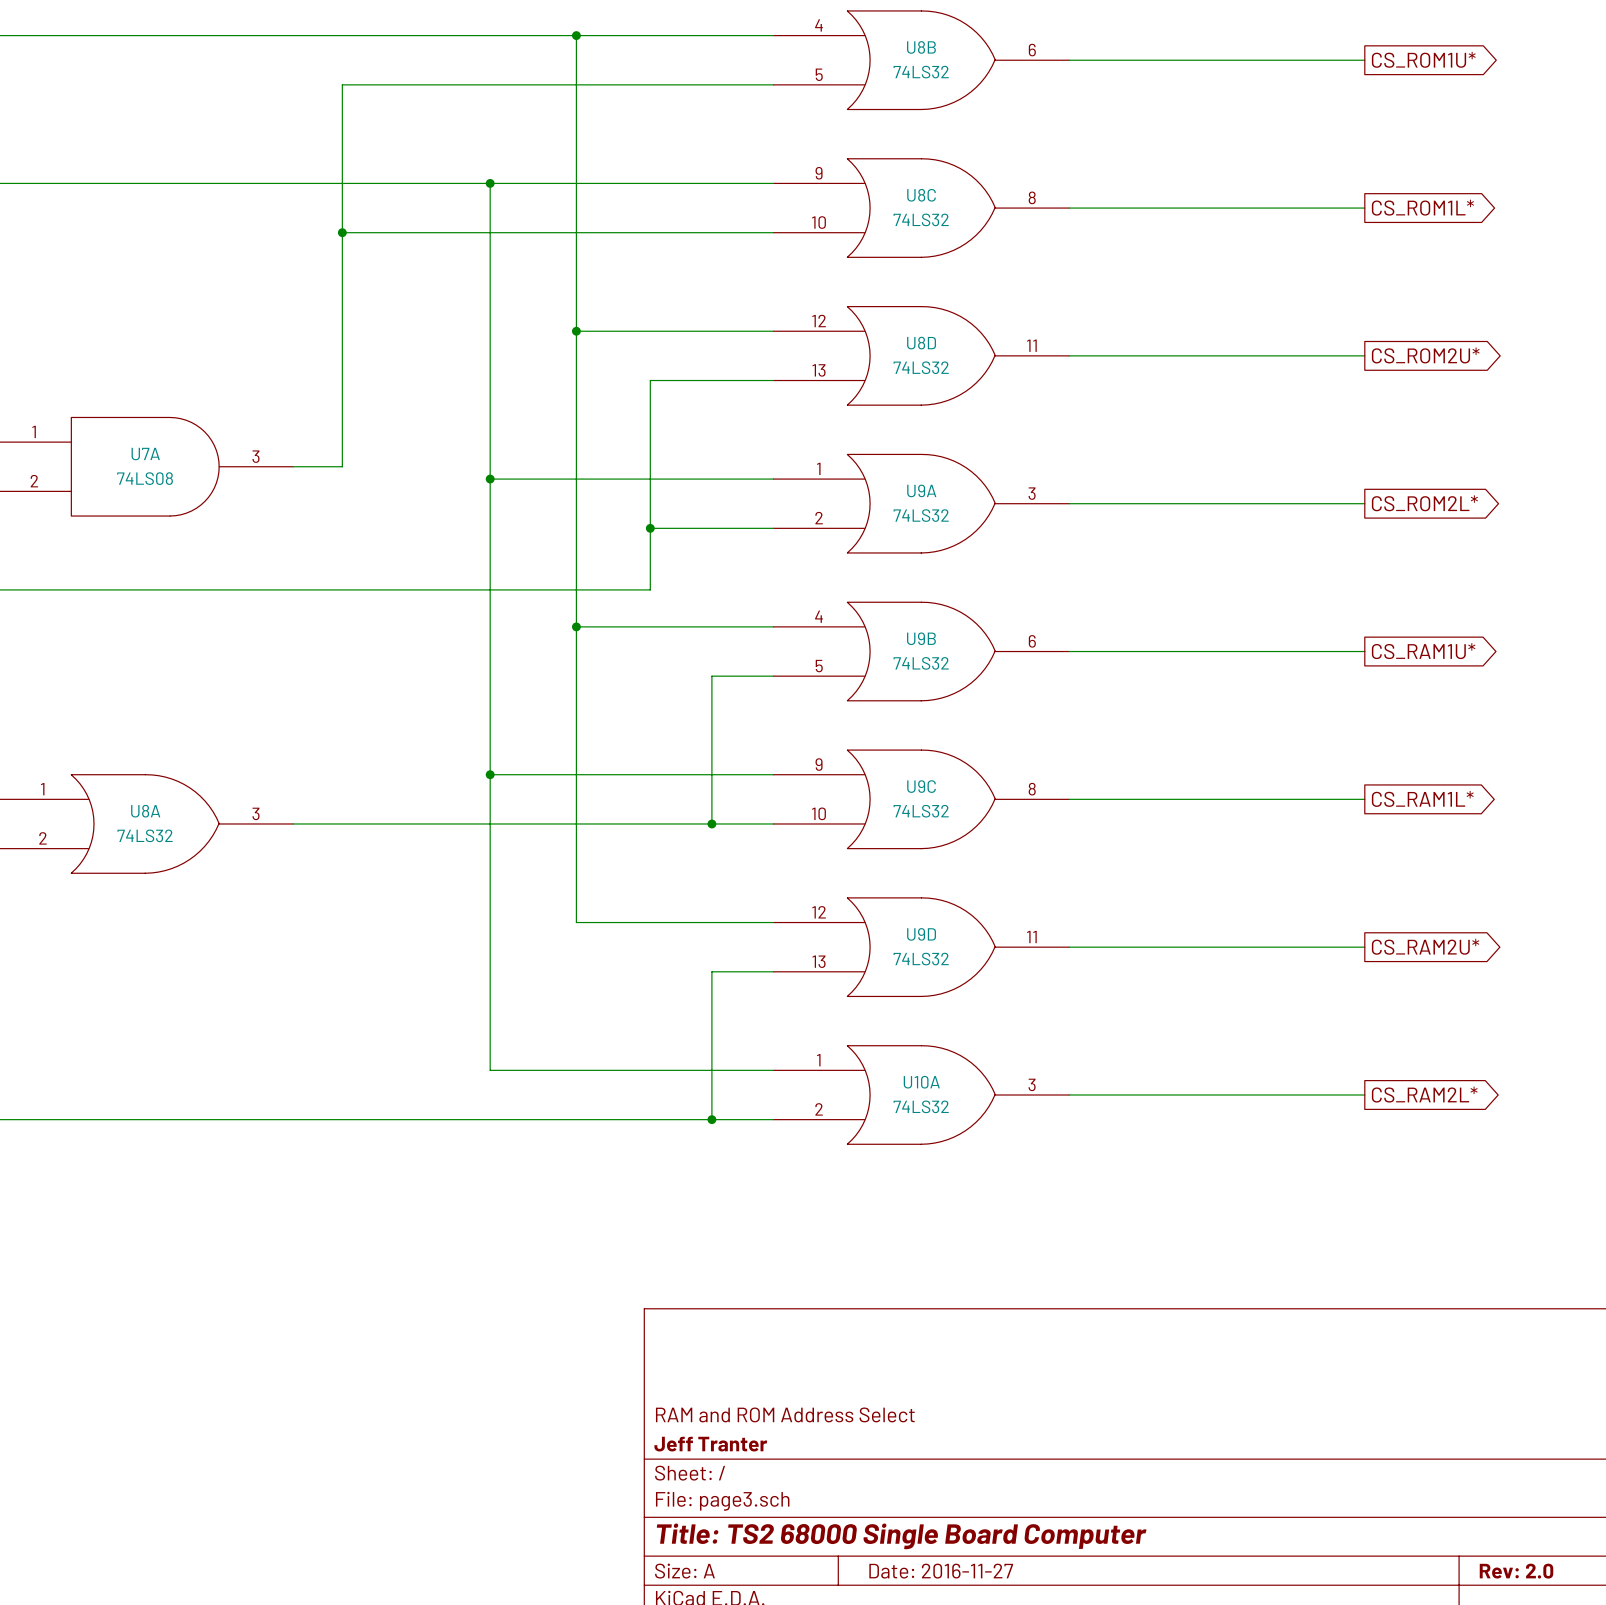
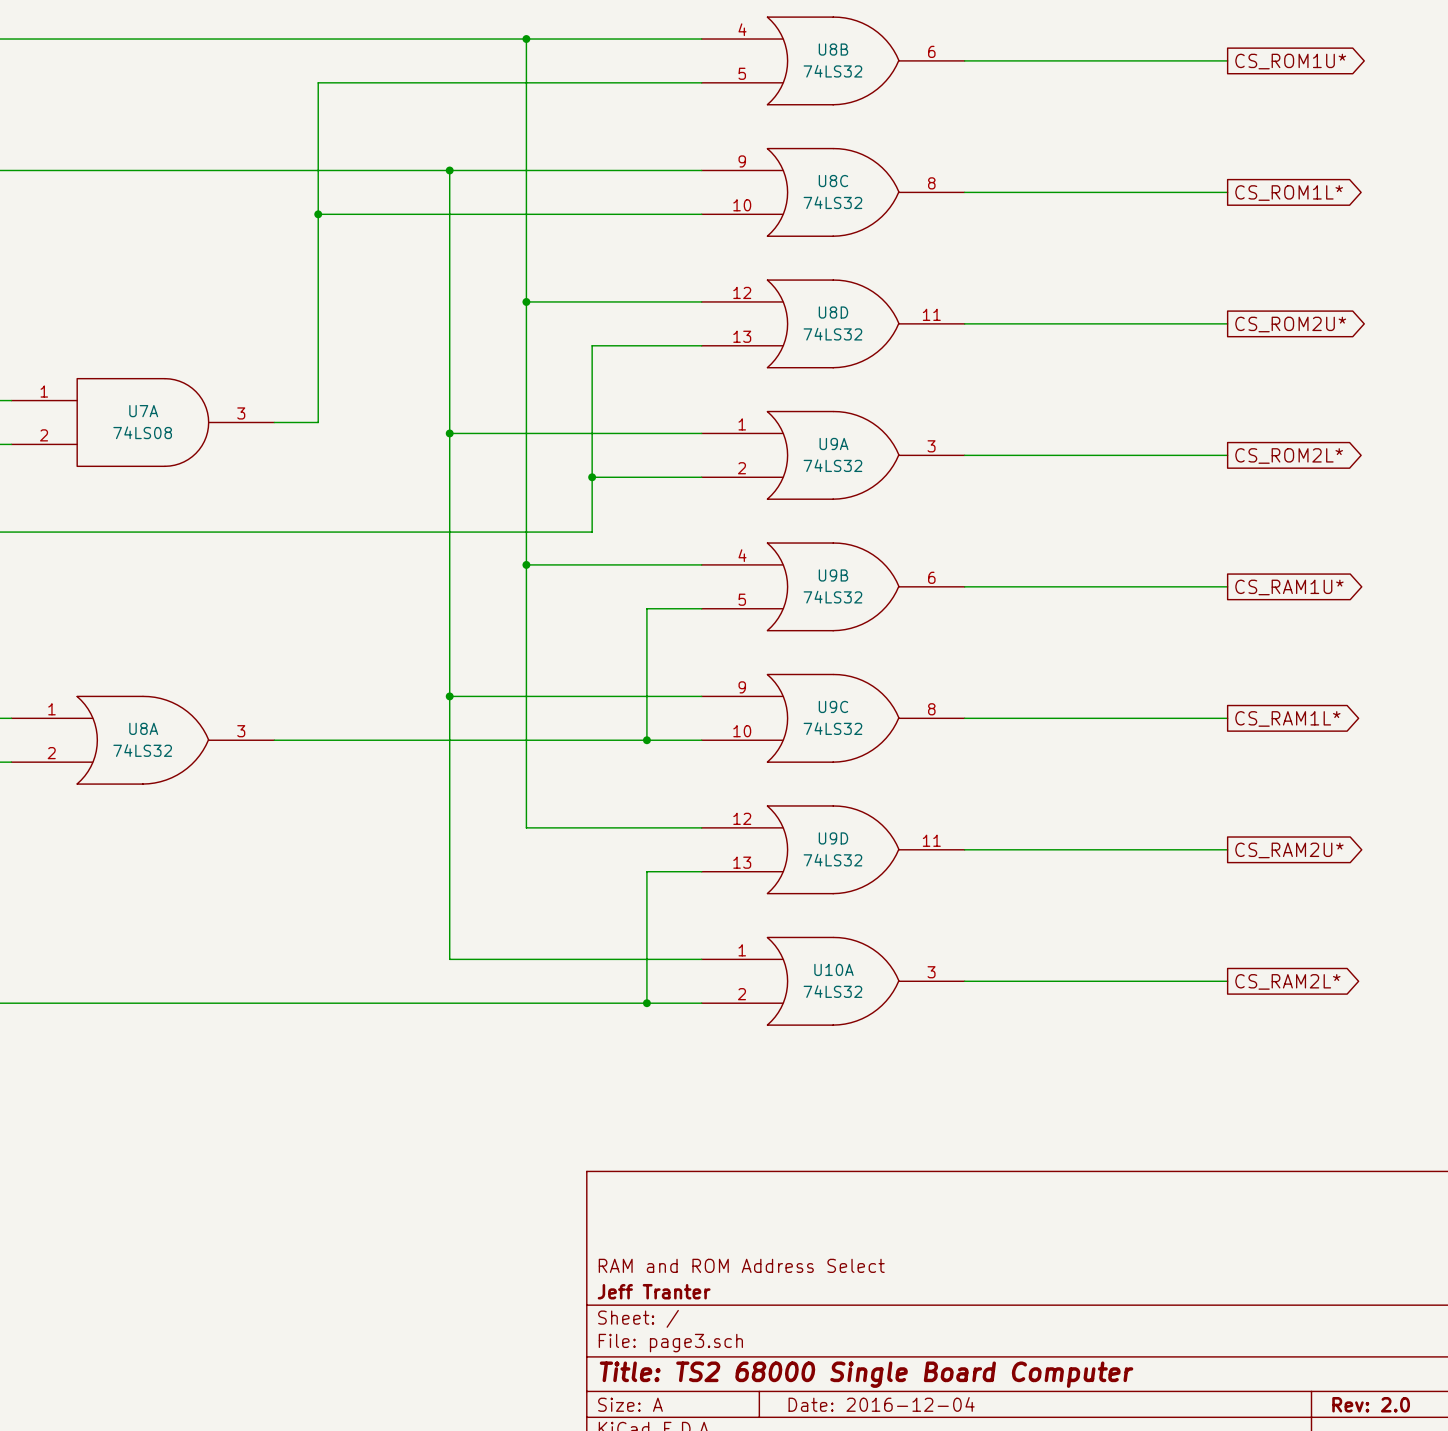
title block: Date: 2016-11-27 (941, 1571) -> Date: 2016-12-04 (881, 1404)

